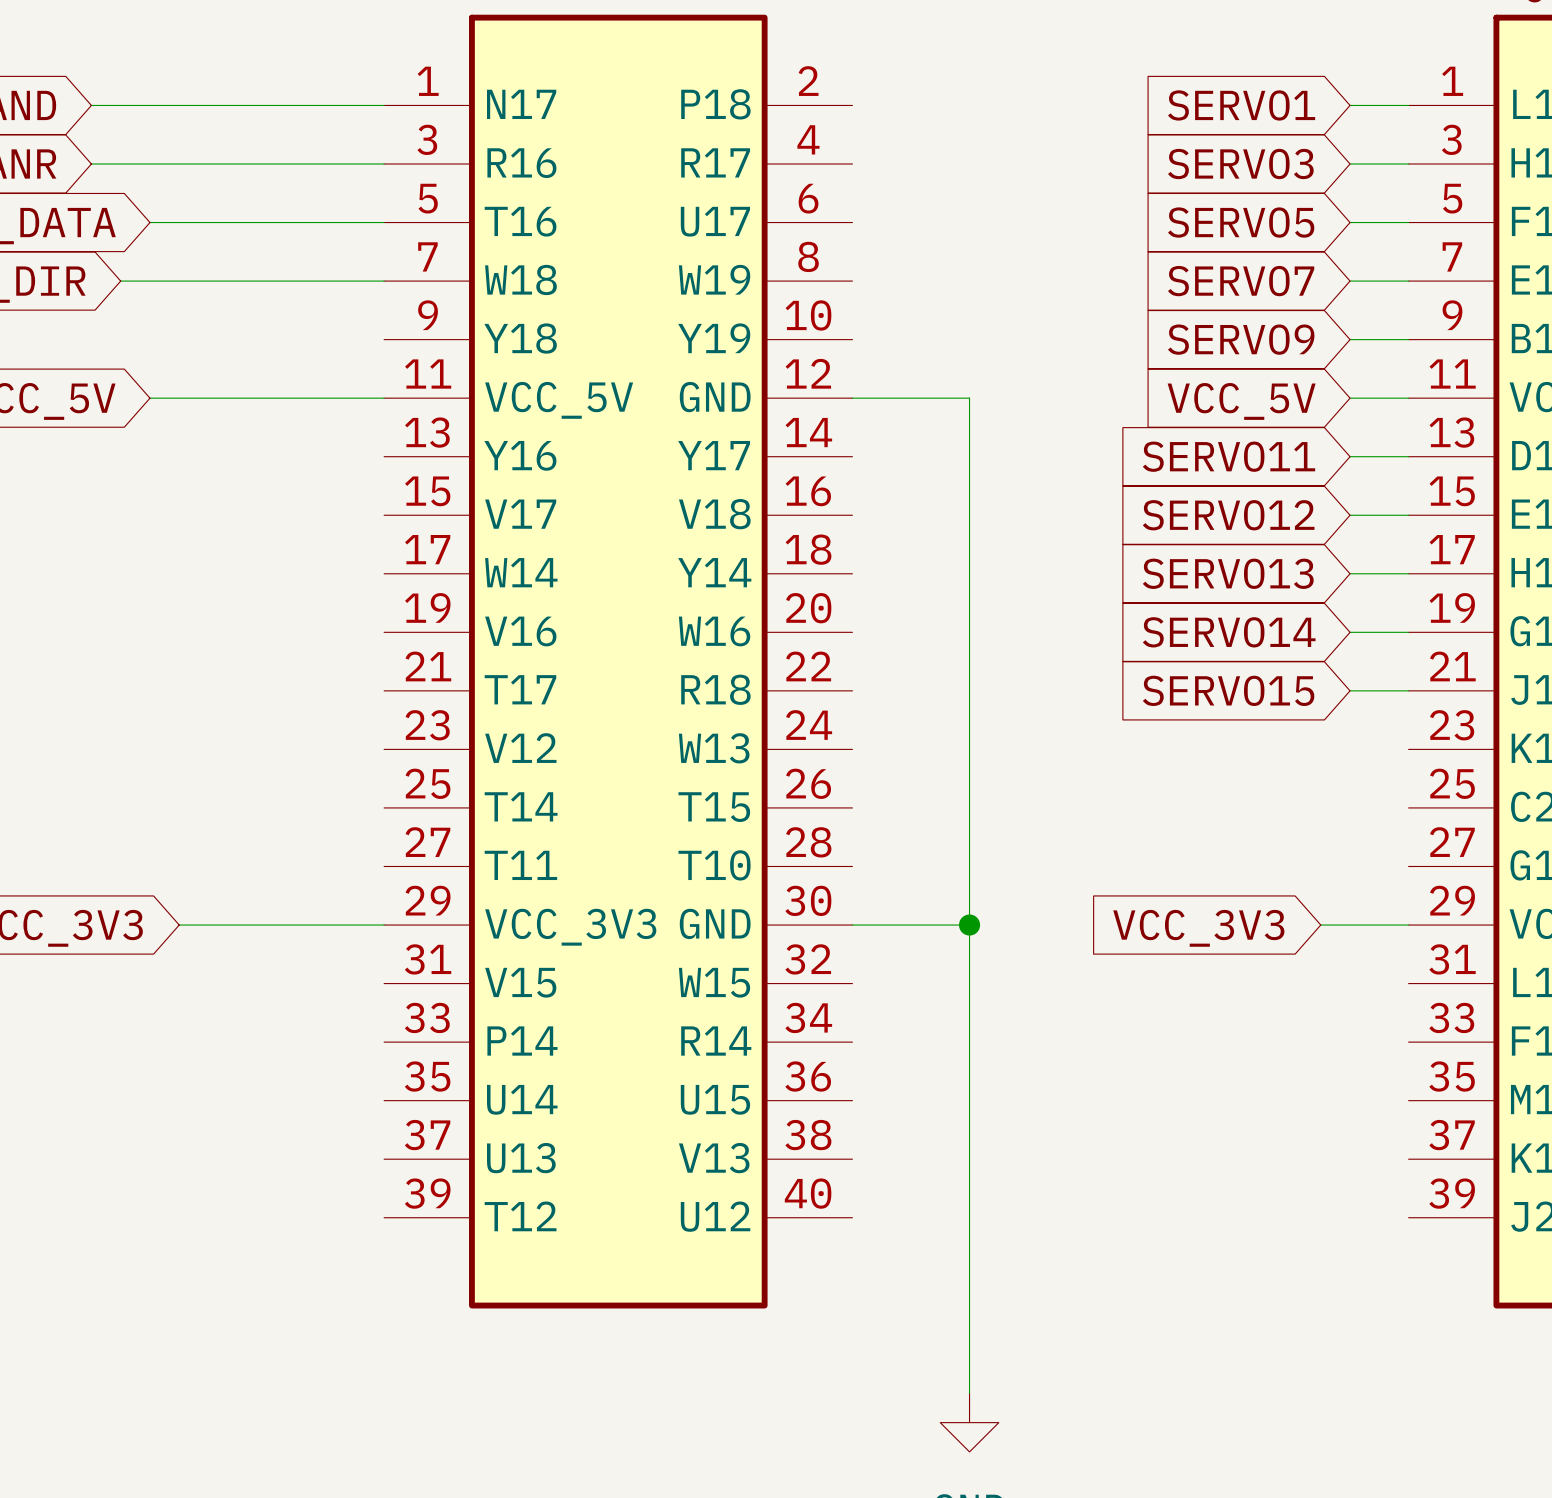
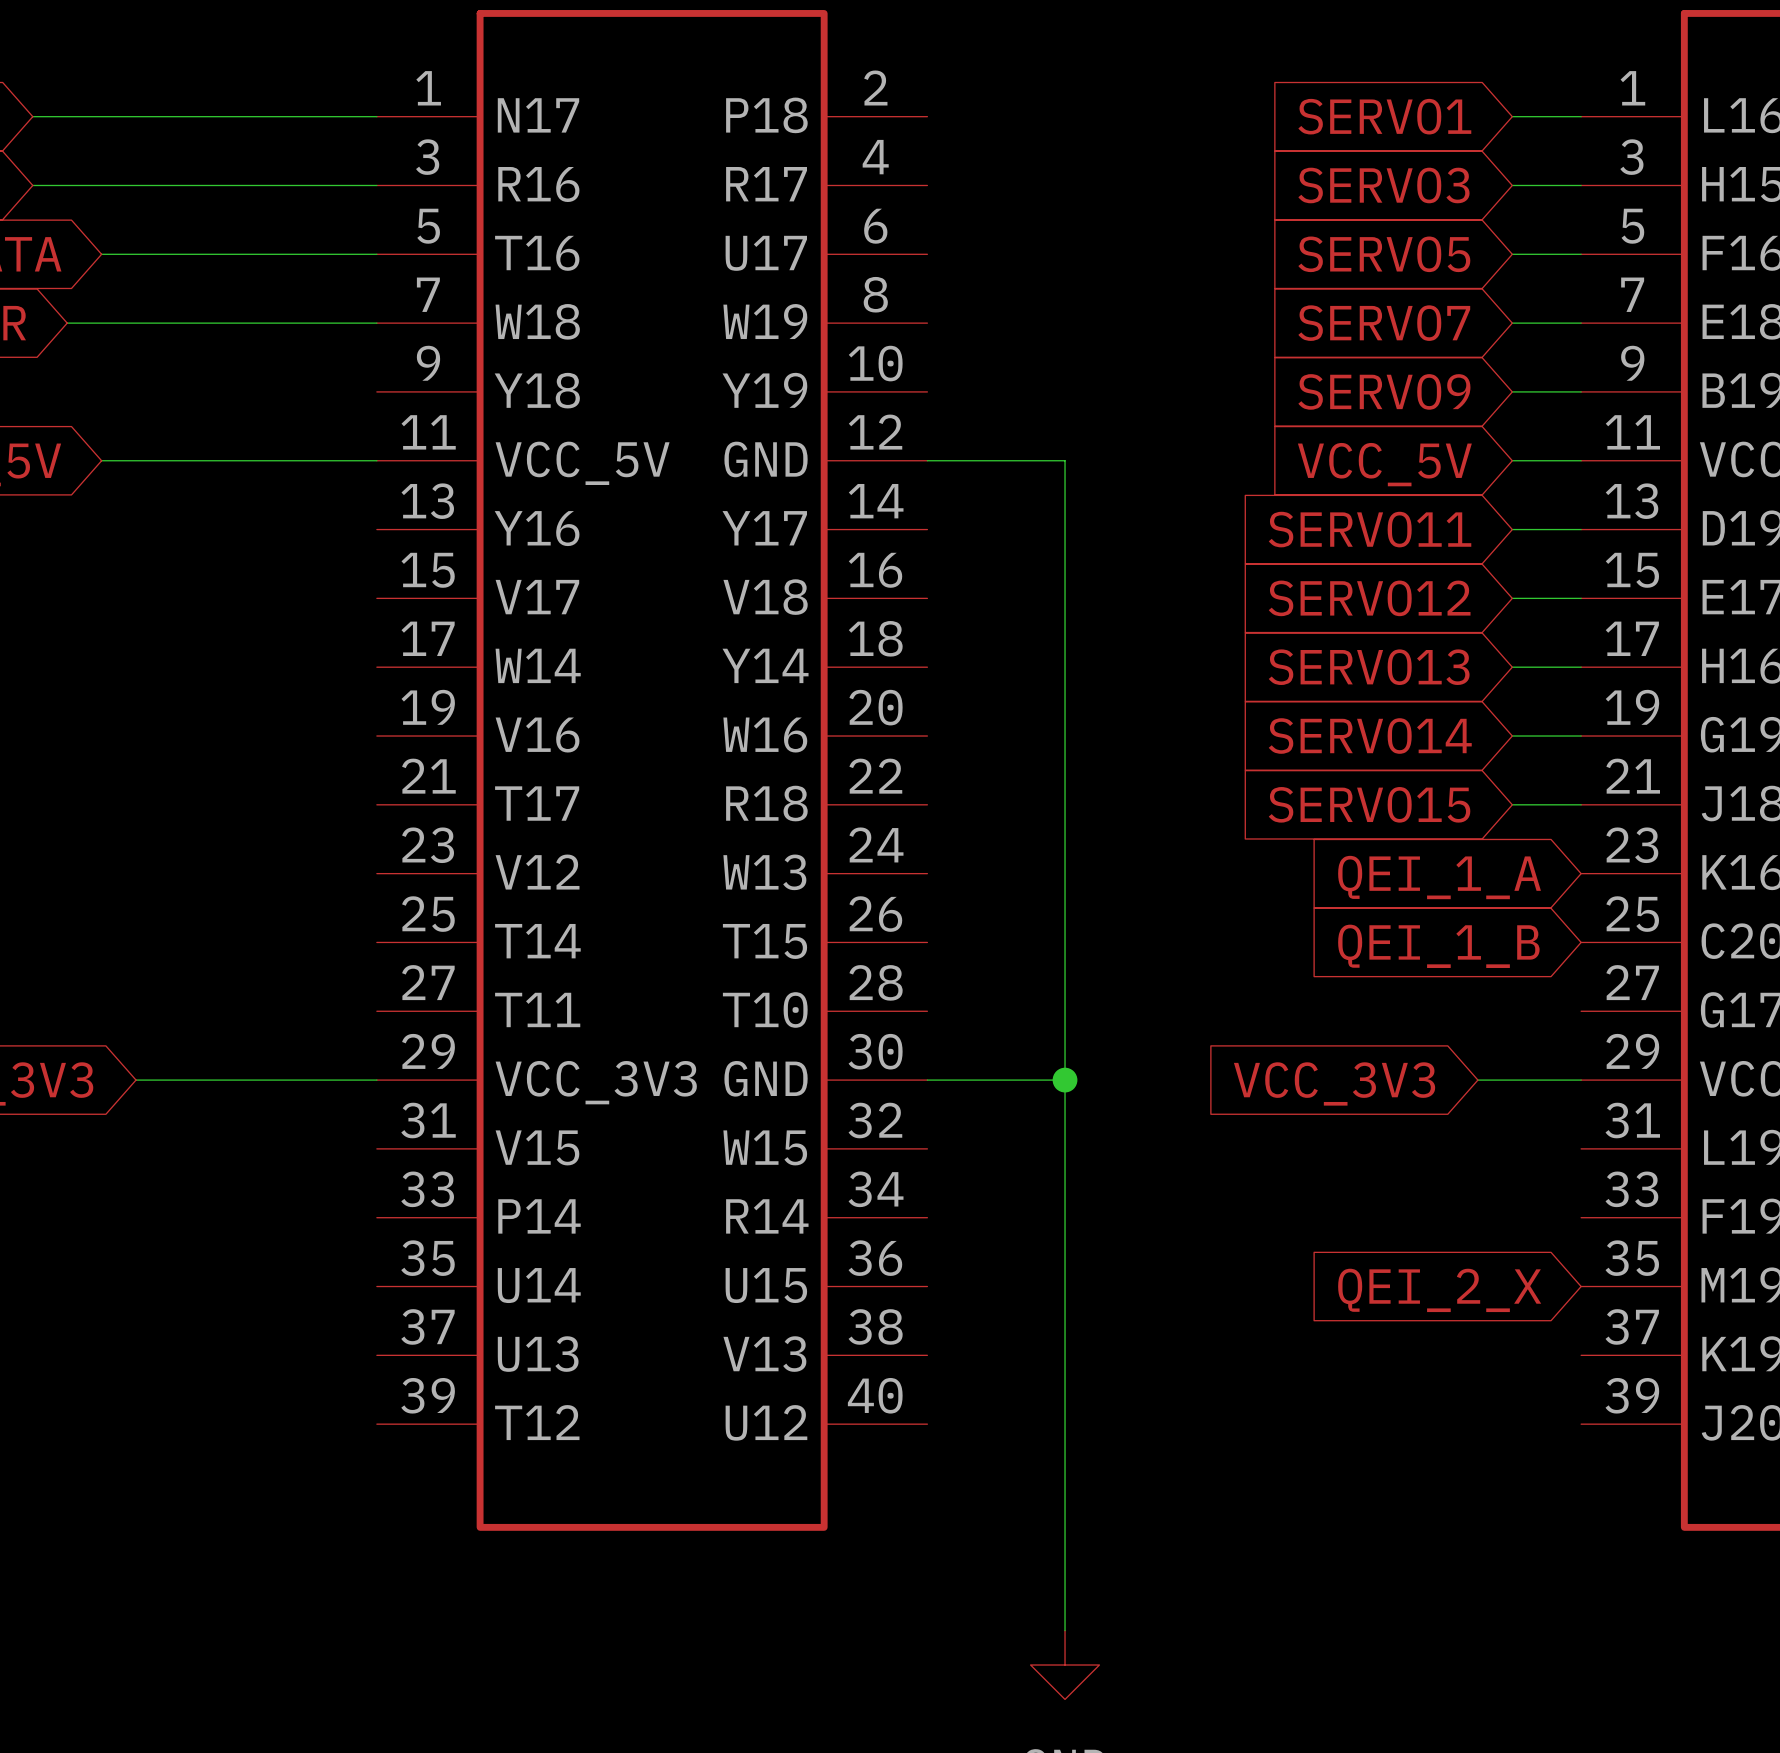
global label: none -> QEI_1_A (1439, 877)
global label: none -> QEI_1_B (1438, 946)
global label: none -> QEI_2_X (1439, 1290)

